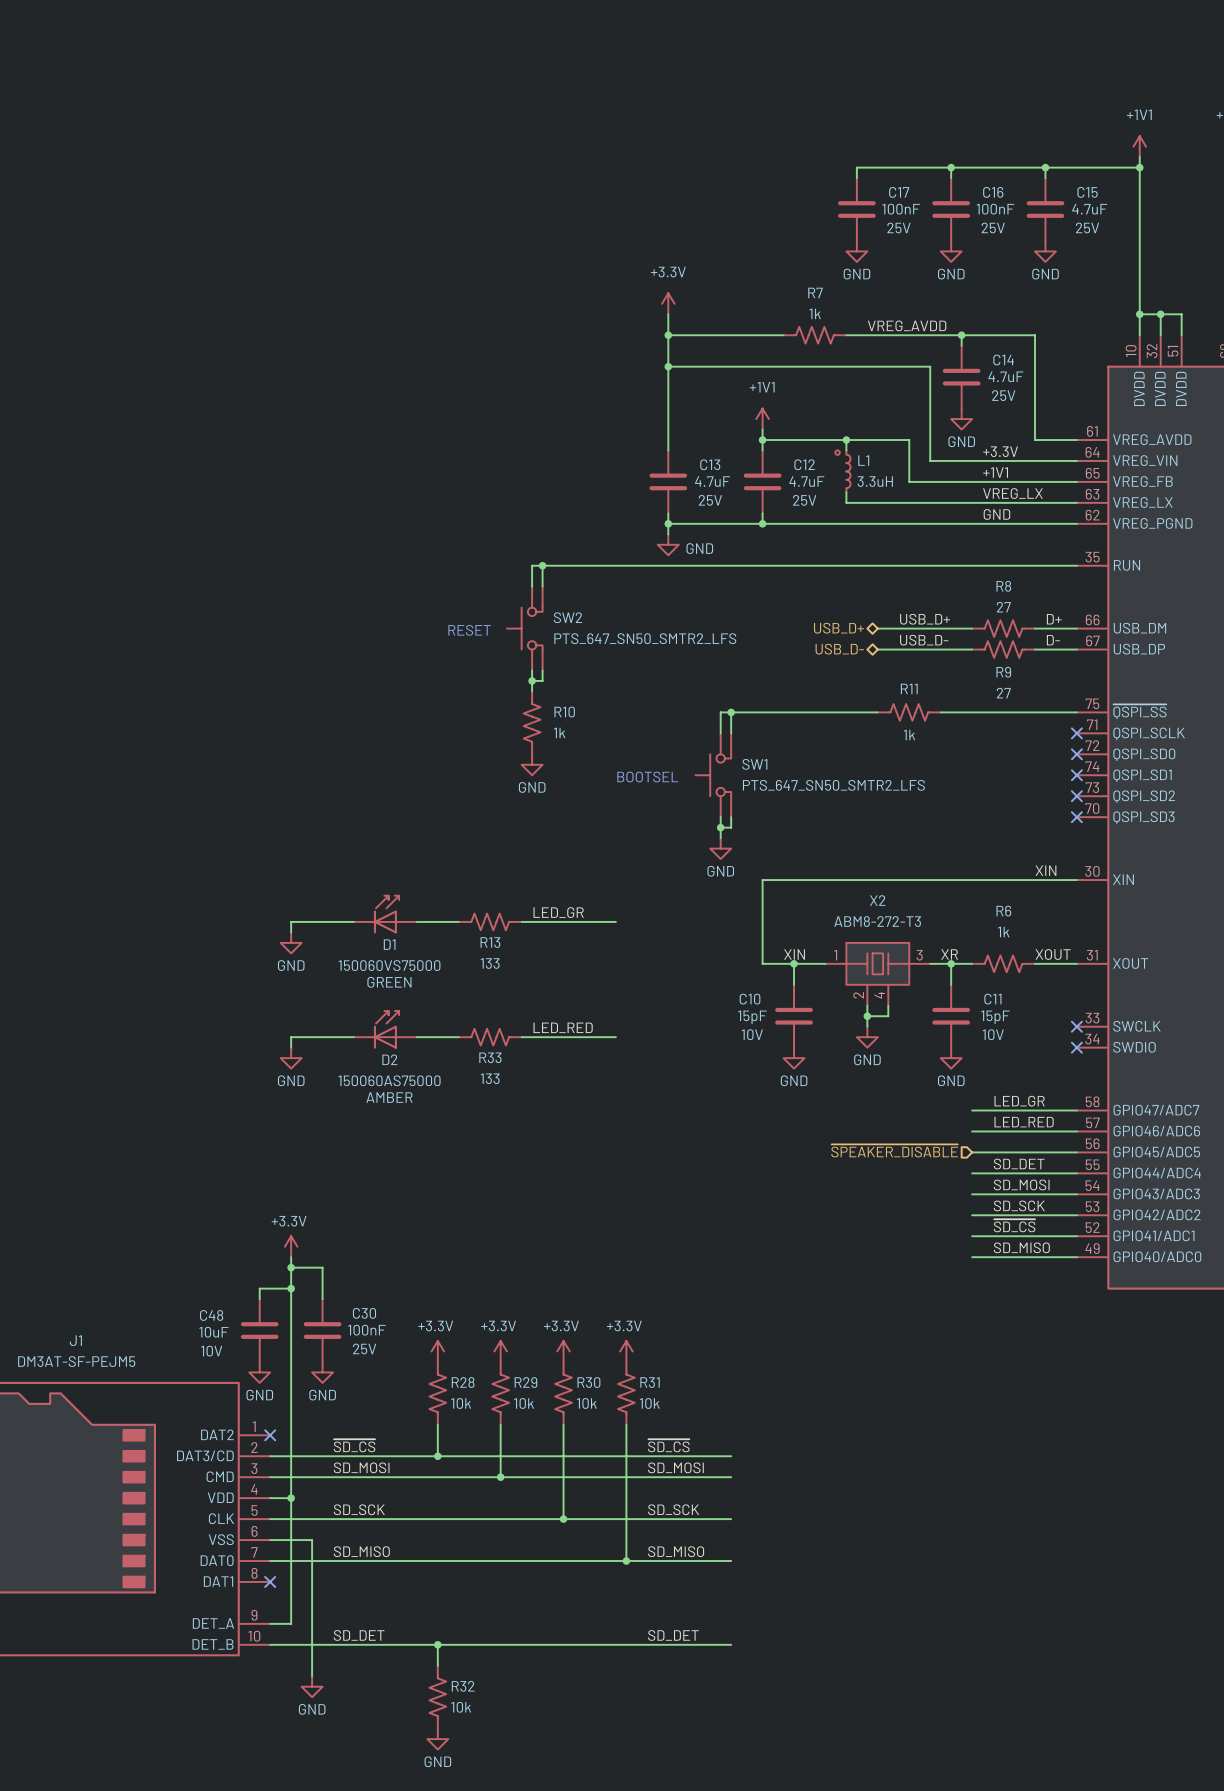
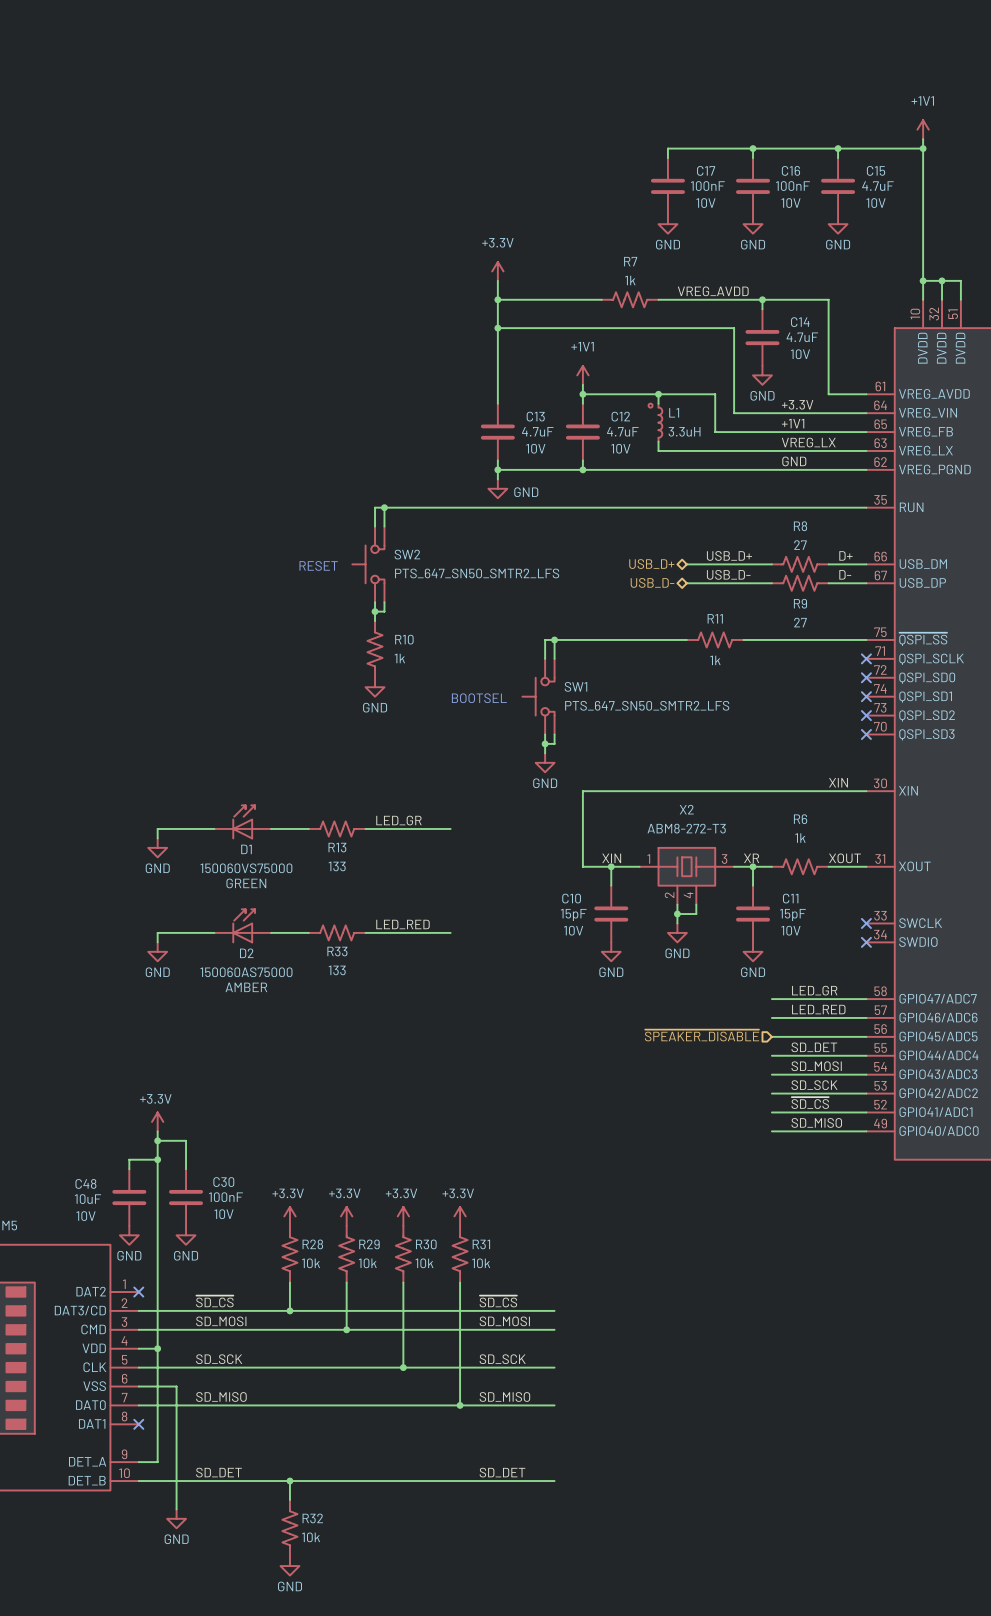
C17 text: 25V (898, 227) -> 10V (705, 203)
C16 text: 25V (993, 227) -> 10V (790, 203)
C15 text: 25V (1087, 227) -> 10V (876, 203)
C14 text: 25V (1003, 395) -> 10V (800, 354)
C13 text: 25V (710, 500) -> 10V (535, 448)
C12 text: 25V (804, 500) -> 10V (620, 448)
C30 text: 25V (364, 1348) -> 10V (223, 1214)

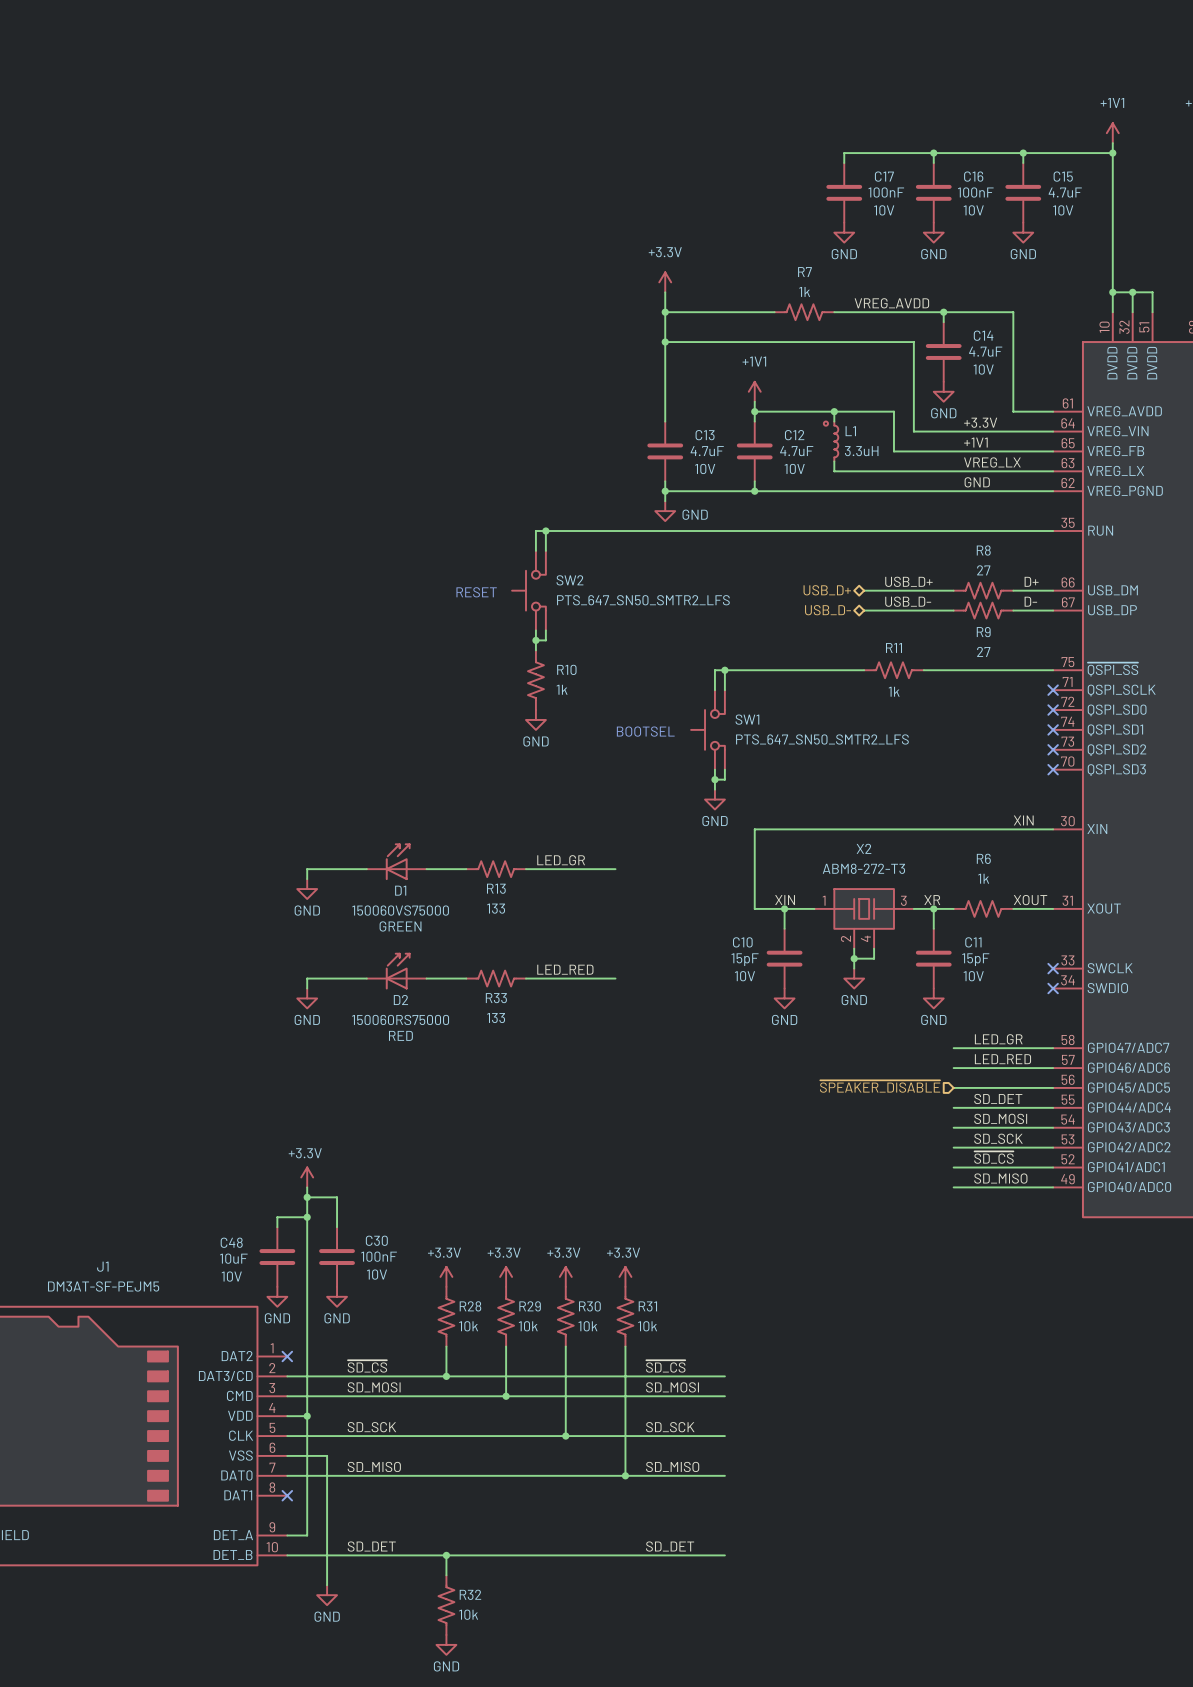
D2 value: 150060AS75000 (246, 972) -> 150060RS75000 (400, 1019)
D2 text: AMBER (246, 987) -> RED (400, 1035)

